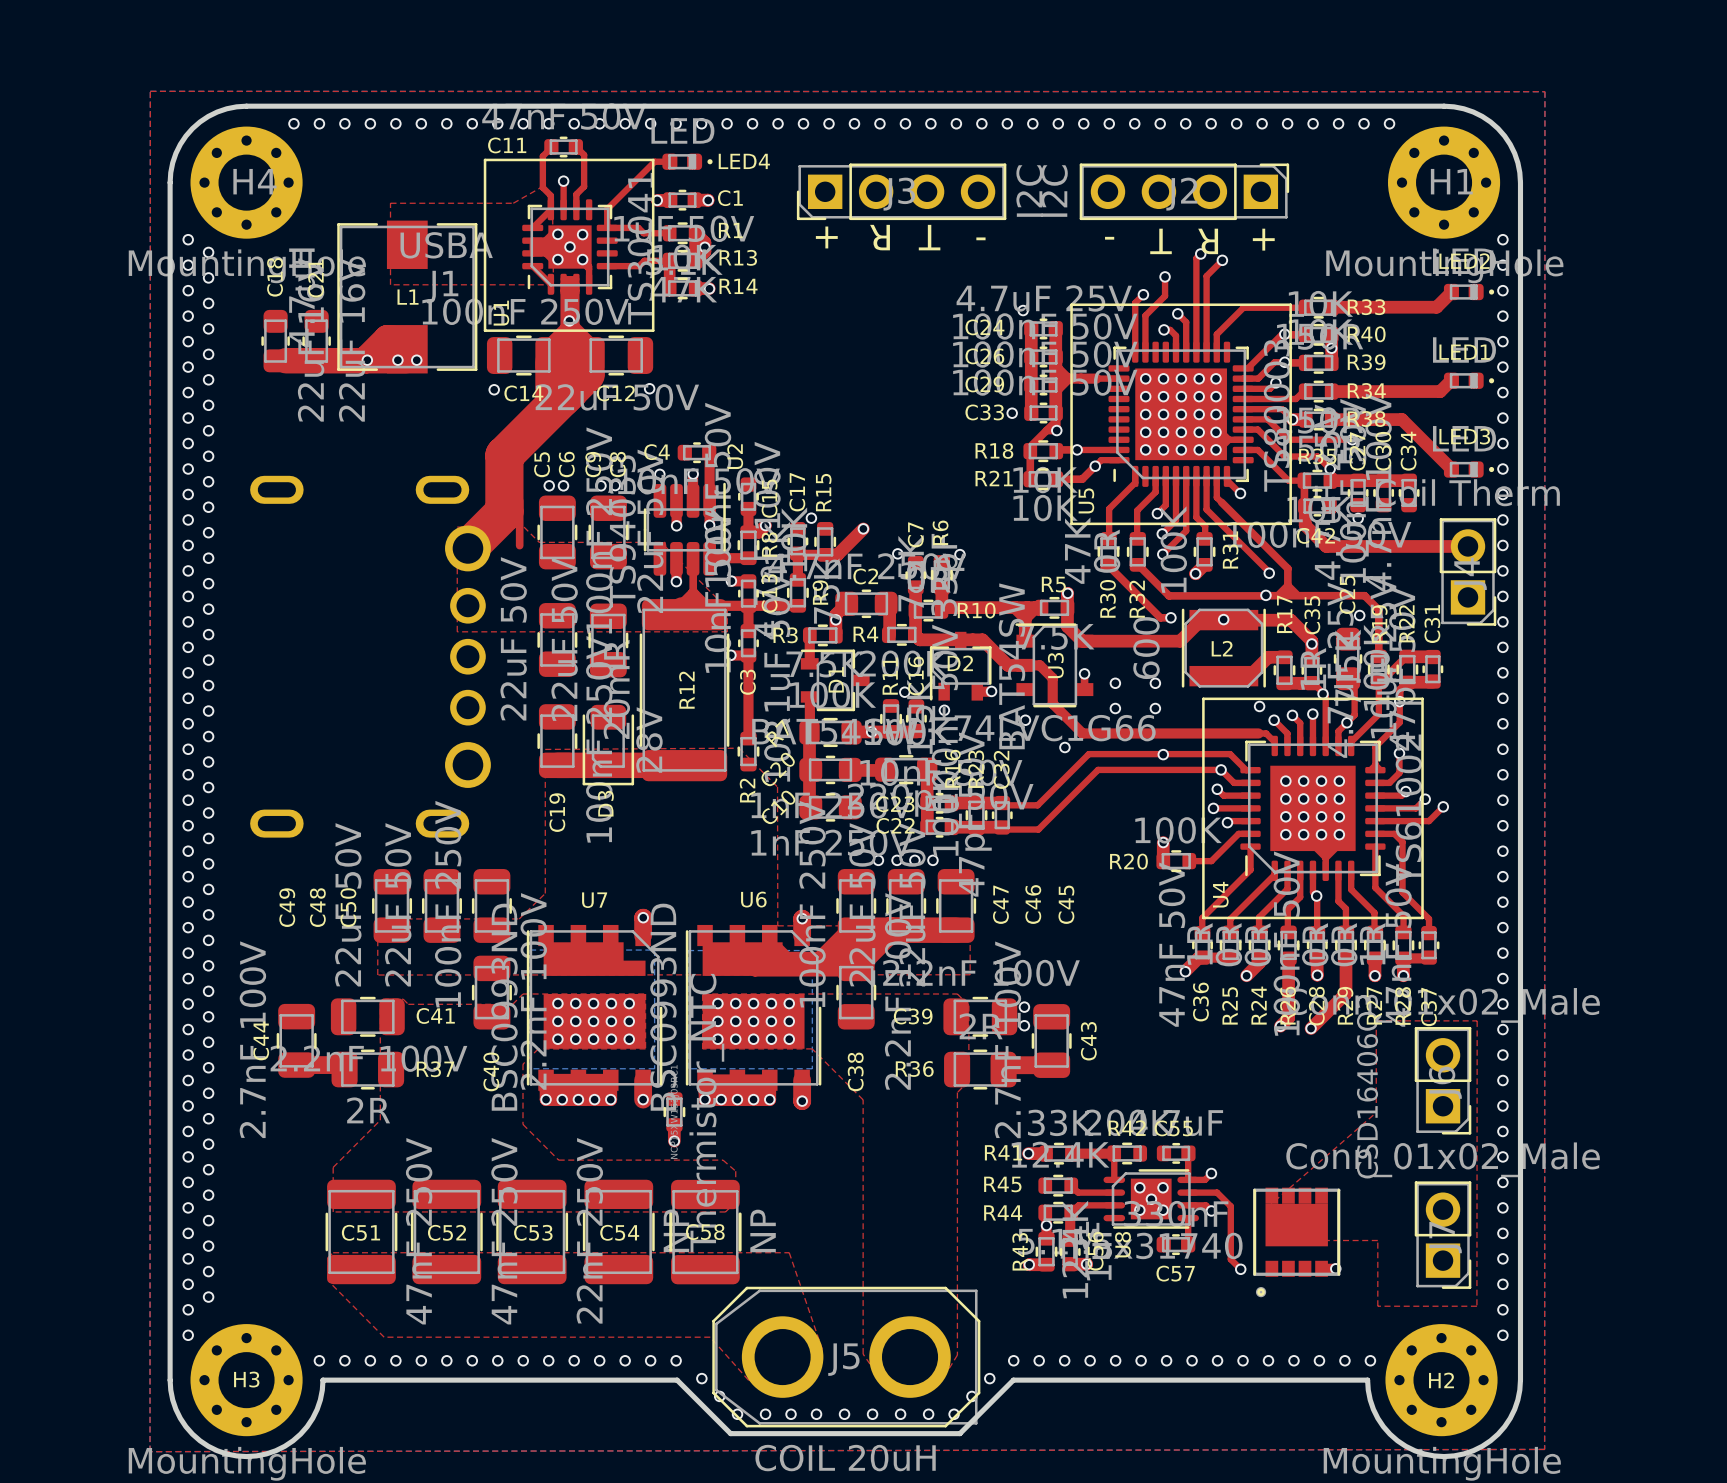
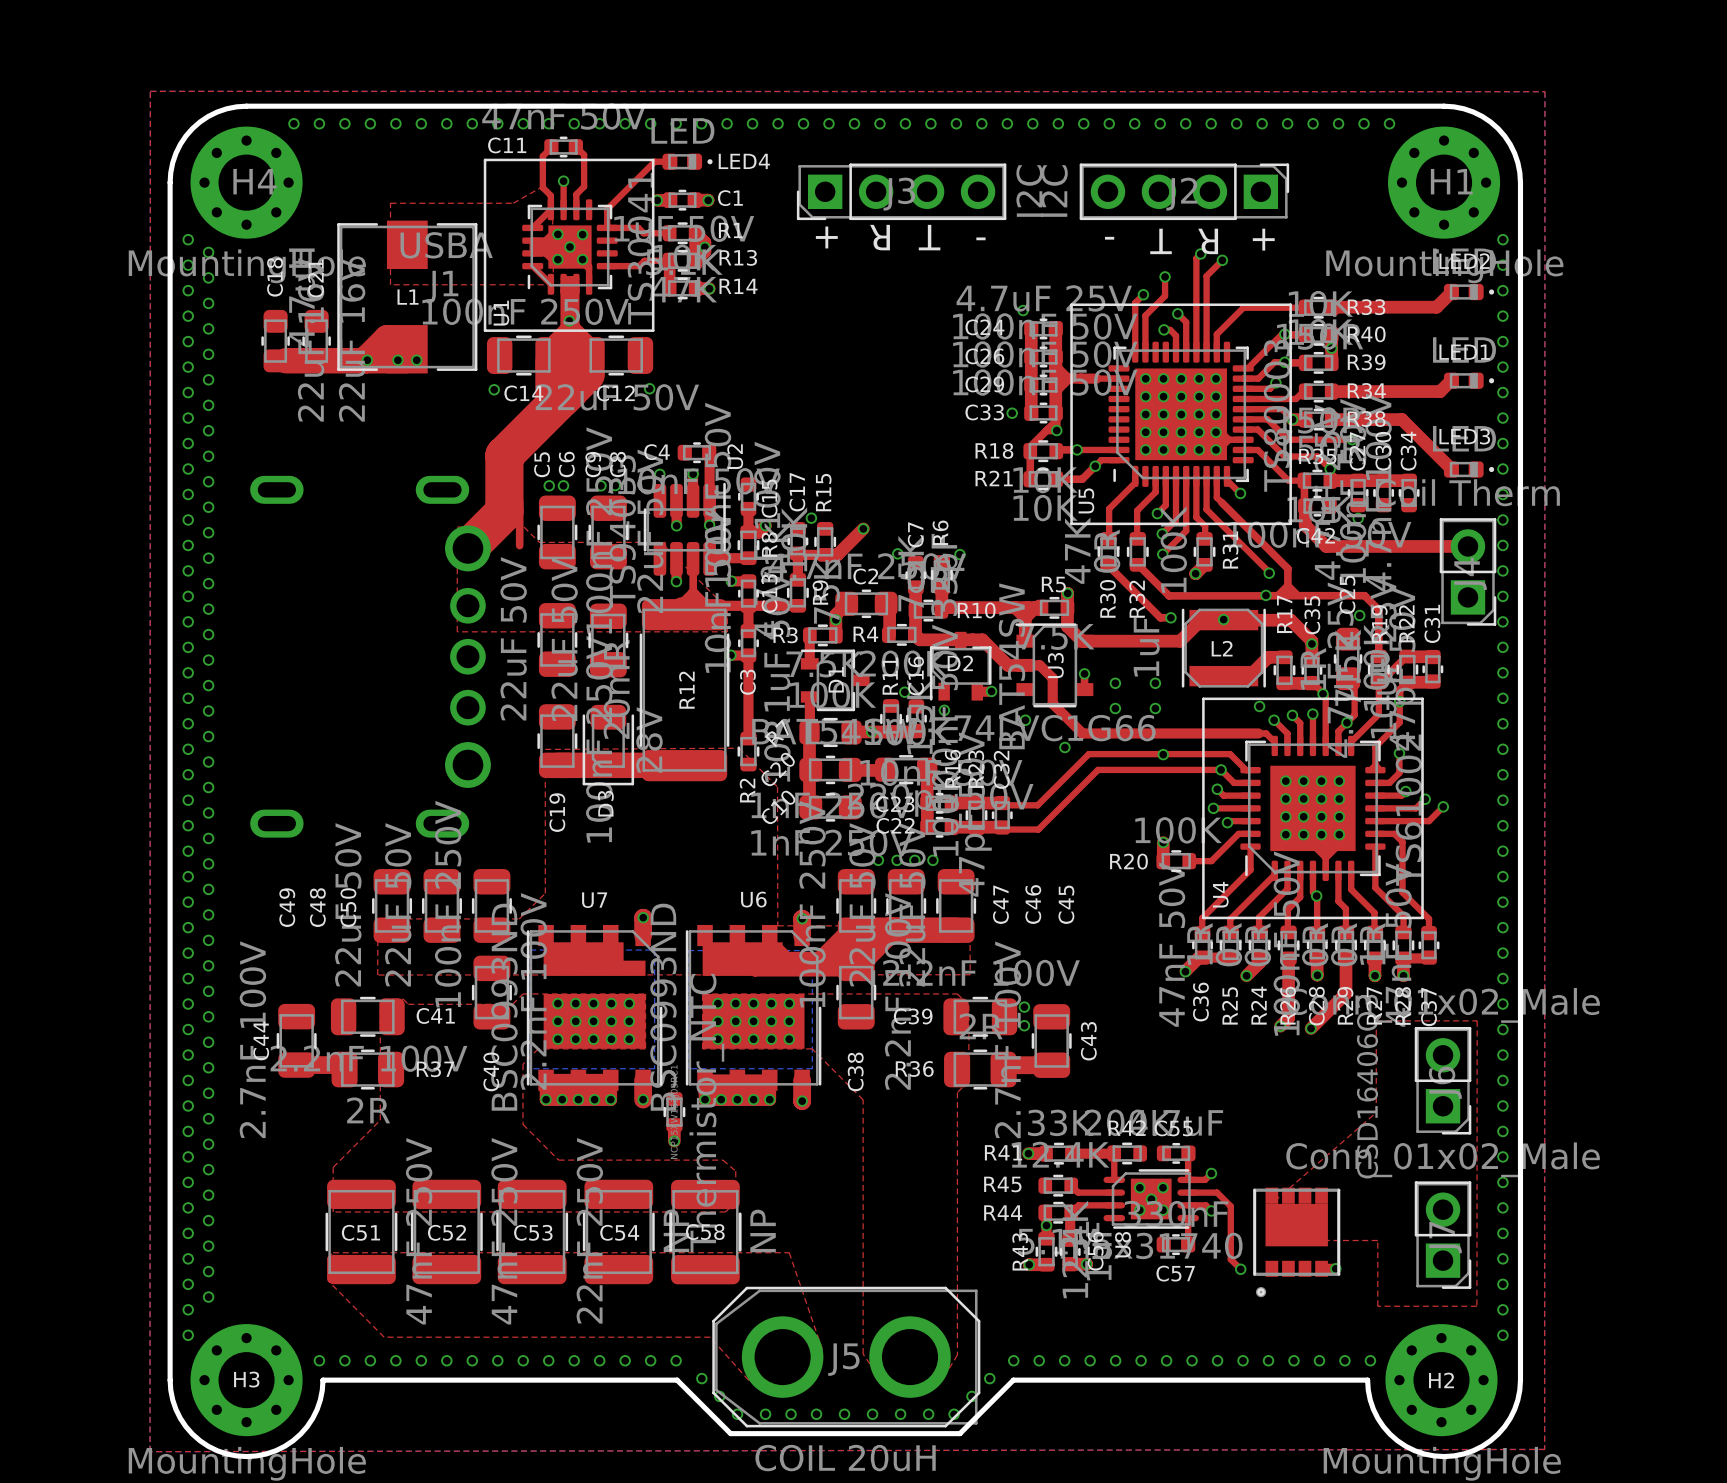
L2 value: 600 (1146, 648) -> 1uF (1146, 647)

